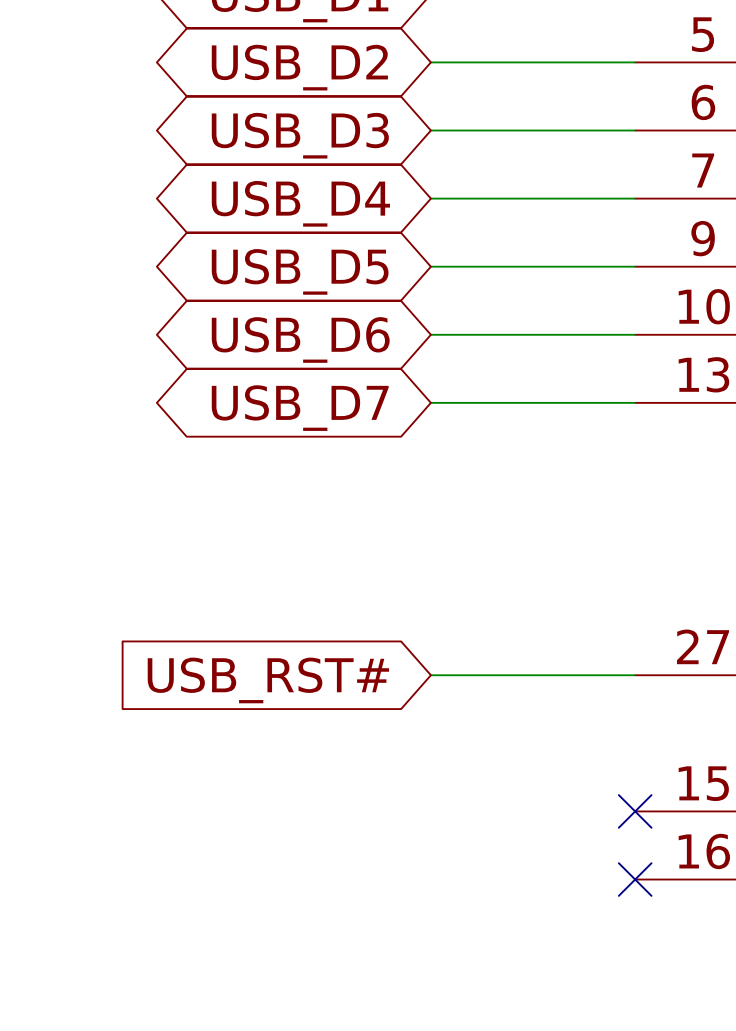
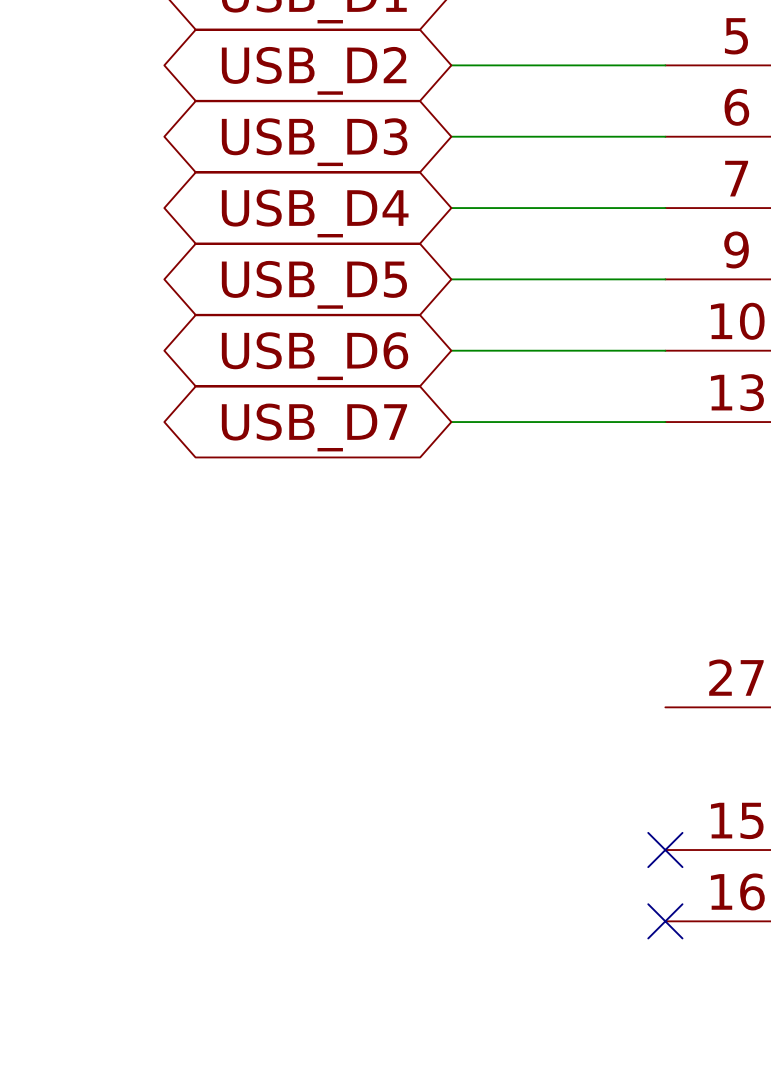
wire: (430, 675) (635, 675) -> none
global label: USB_RST# (268, 680) -> none

